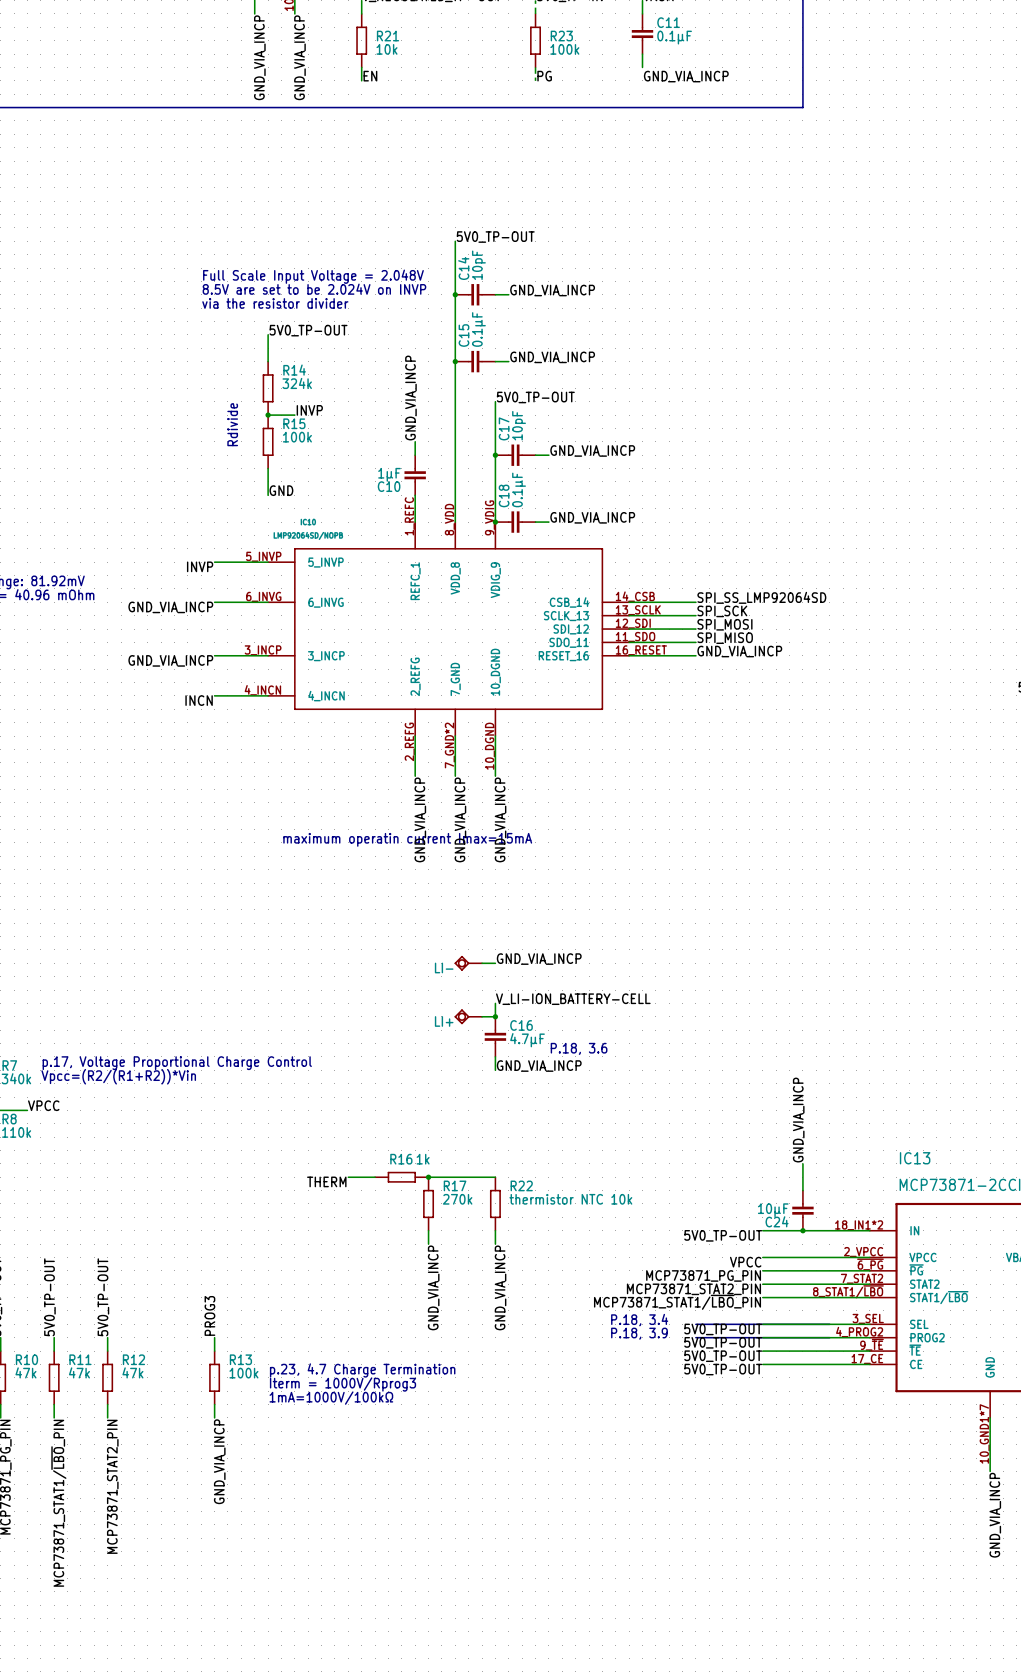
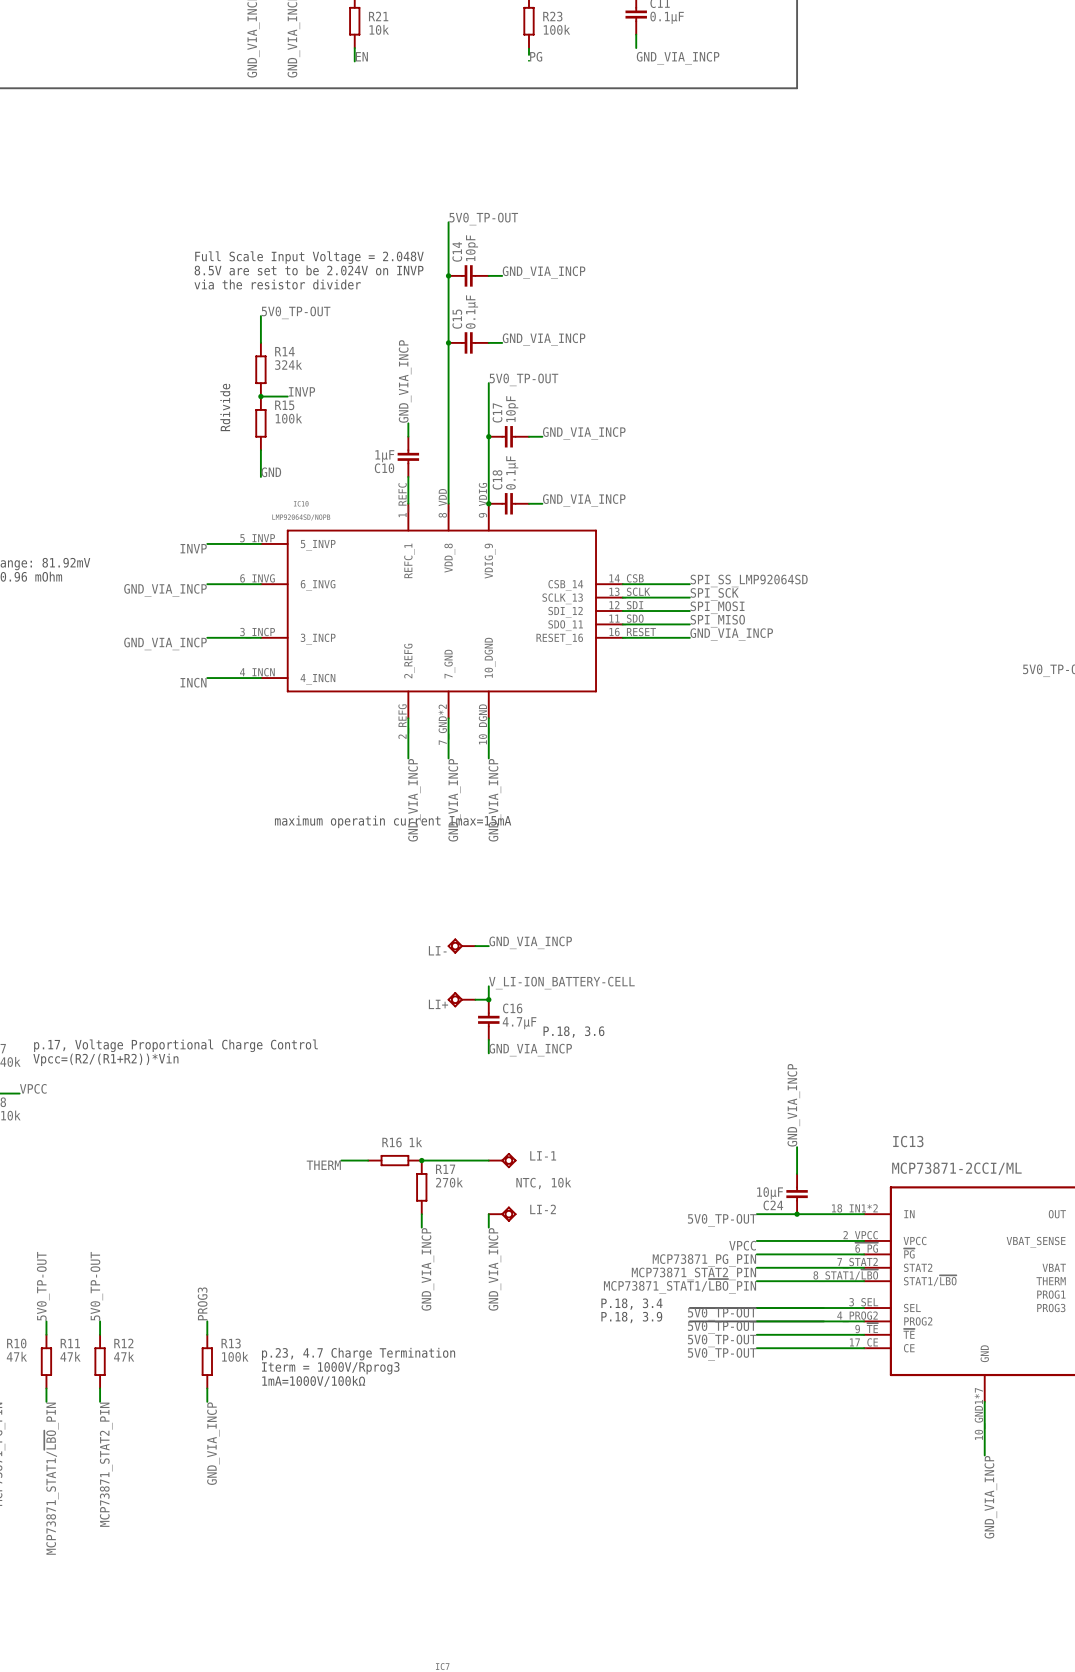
LI-1: none -> (502, 1160)
text: none -> NTC, 10k (543, 1183)
R22: thermistor NTC 10k (495, 1203) -> none
LI-2: none -> (502, 1214)

